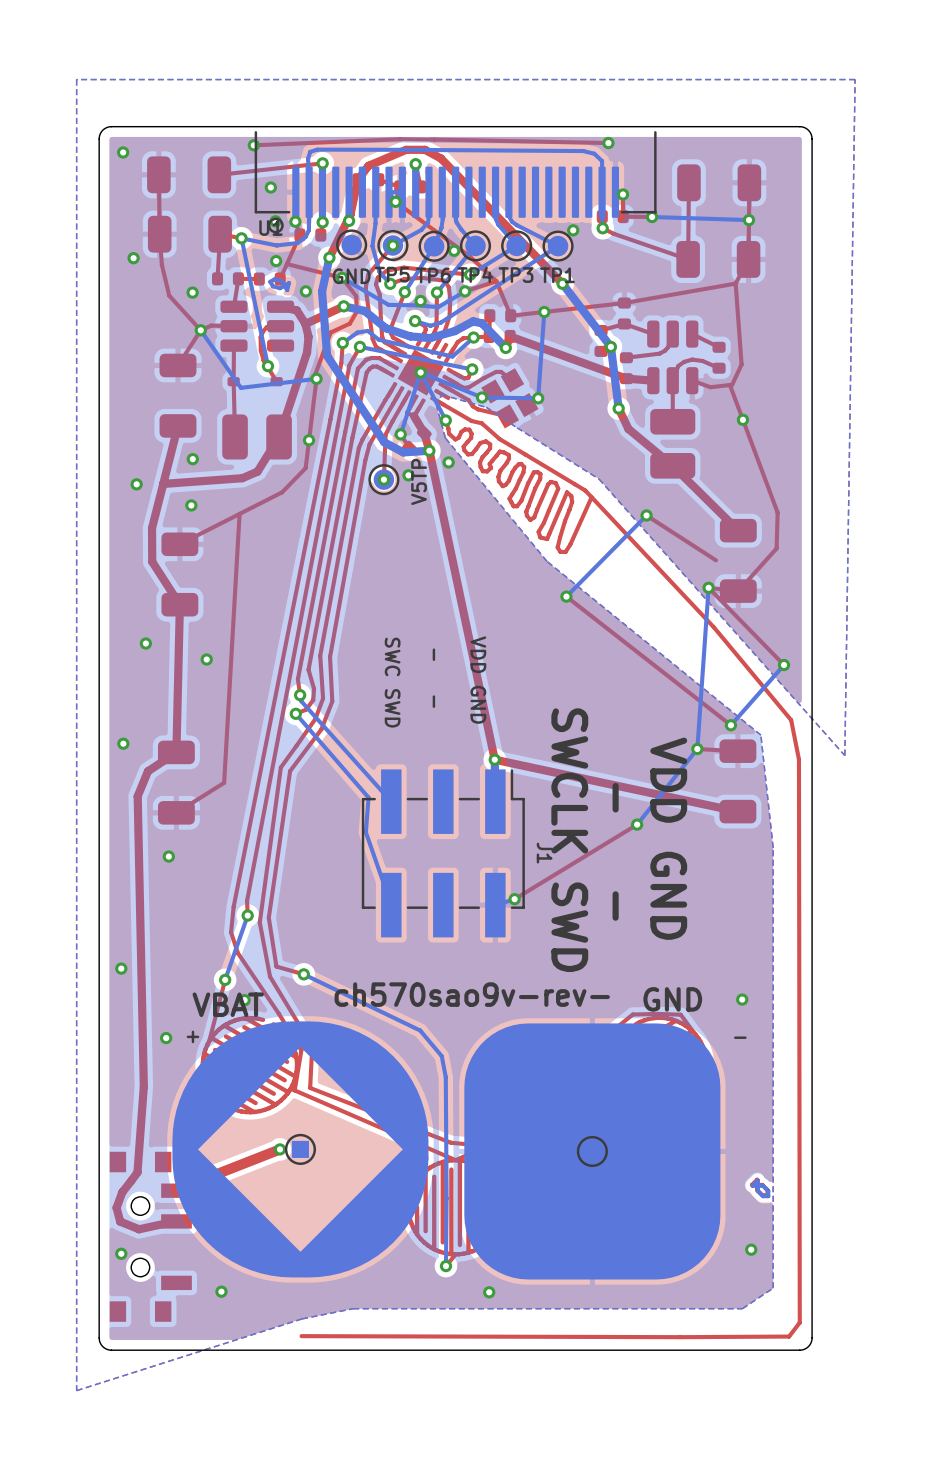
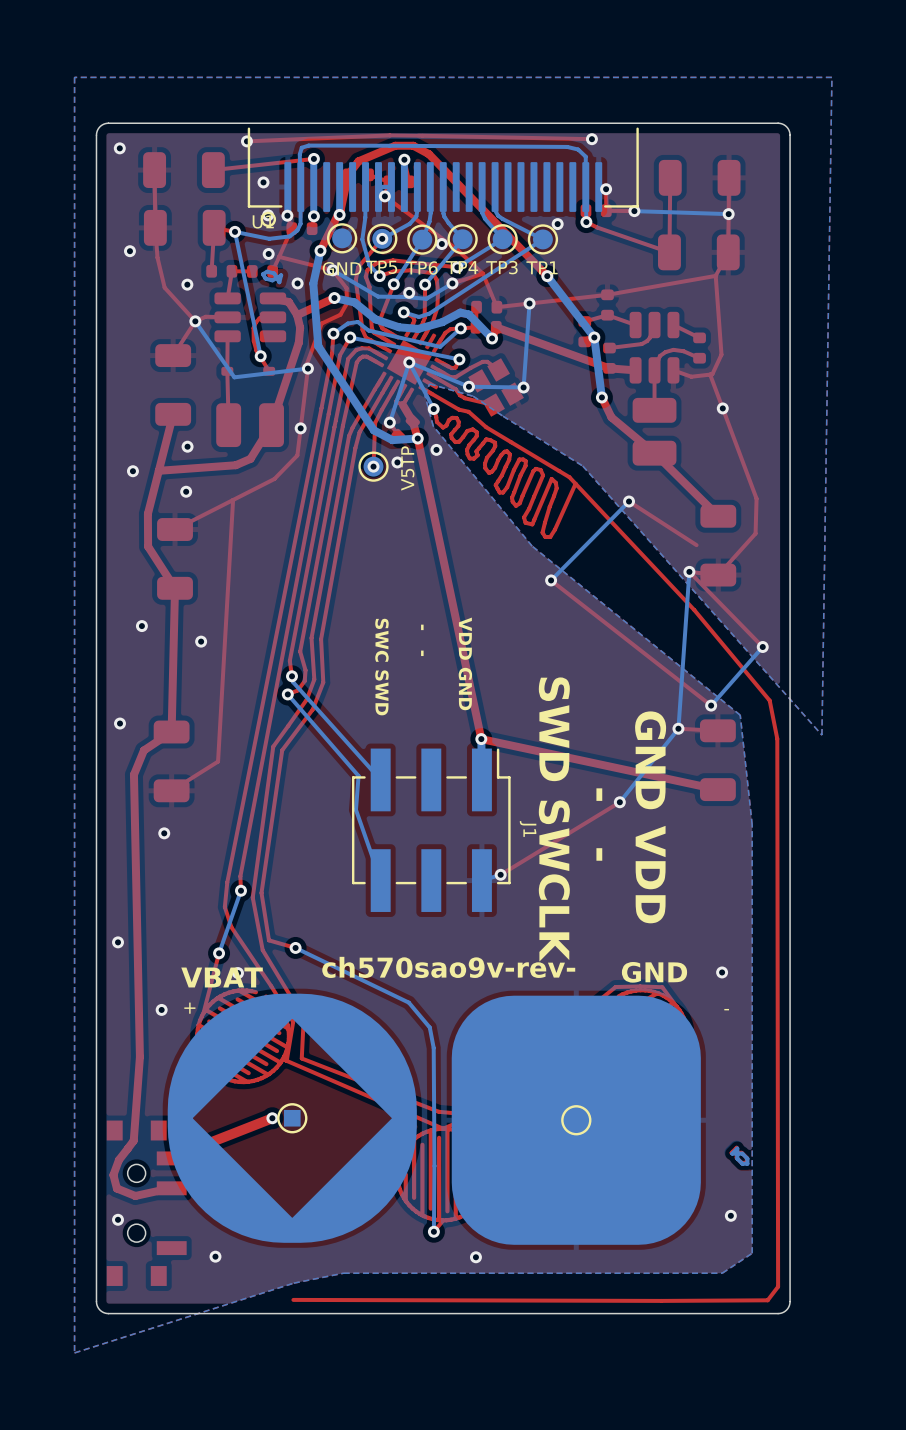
text: VDD GND (668, 838) -> GND VDD (650, 817)
text: SWCLK SWD (569, 840) -> SWD SWCLK (554, 819)

